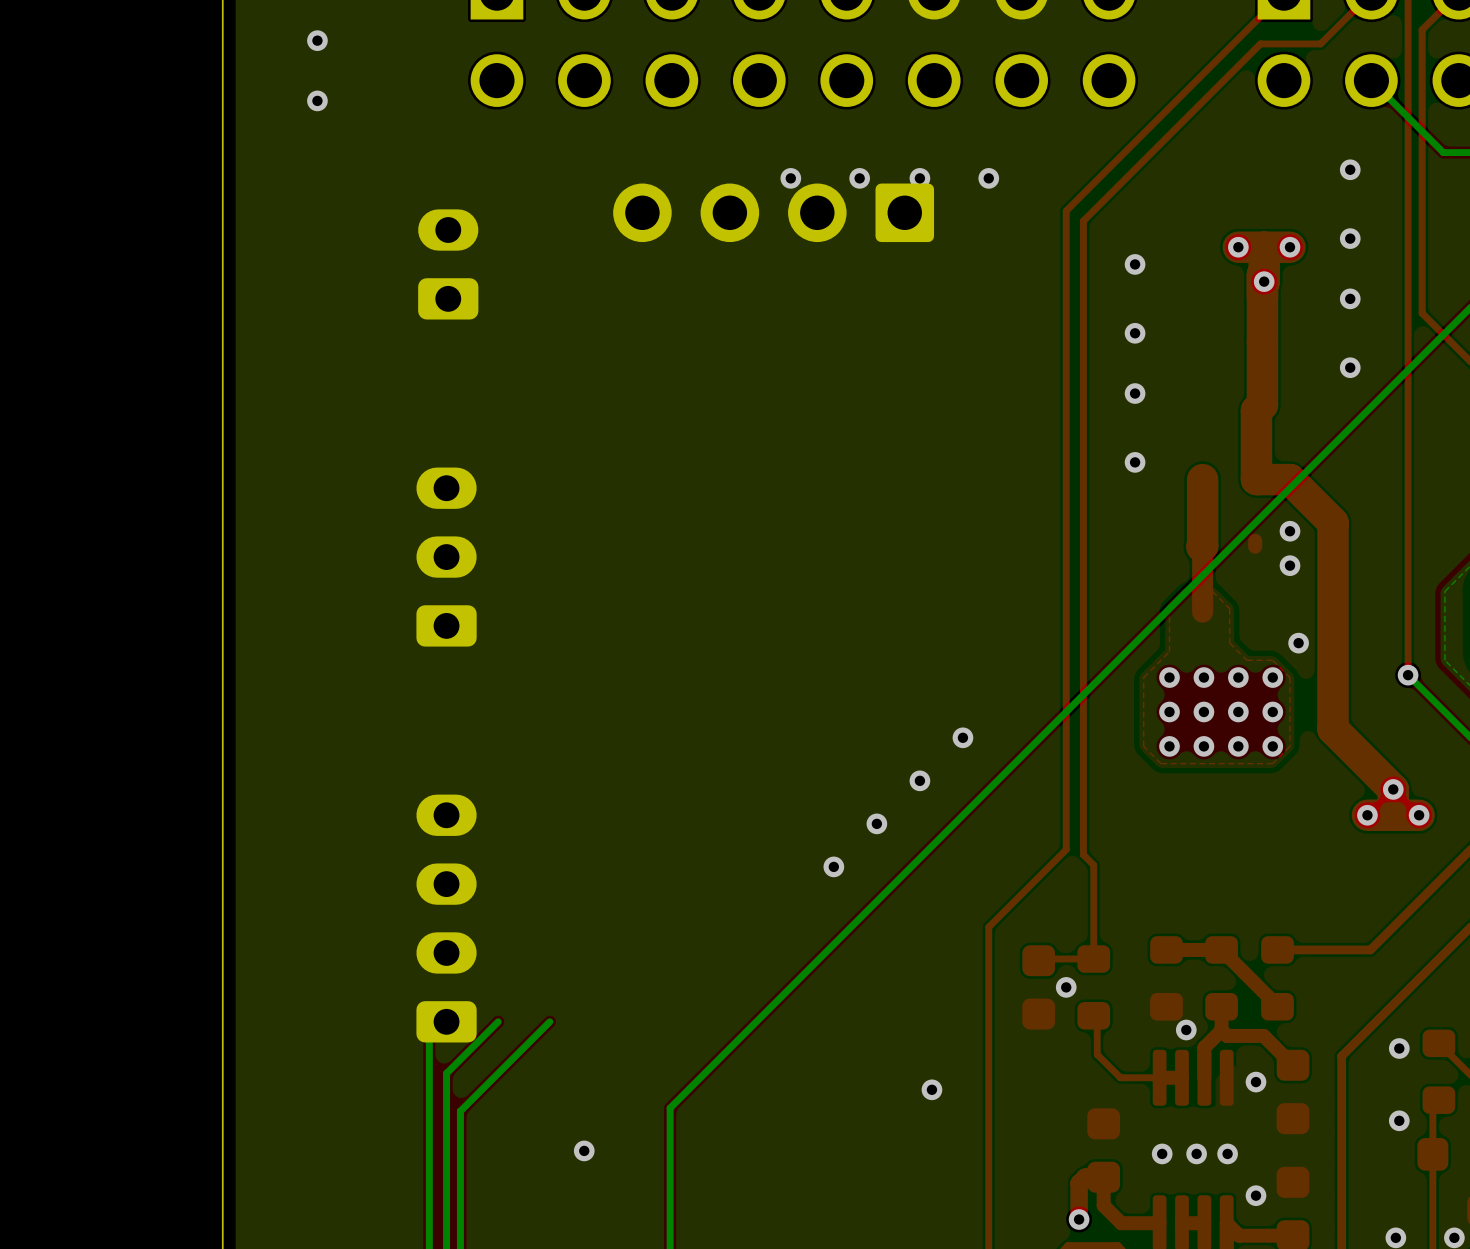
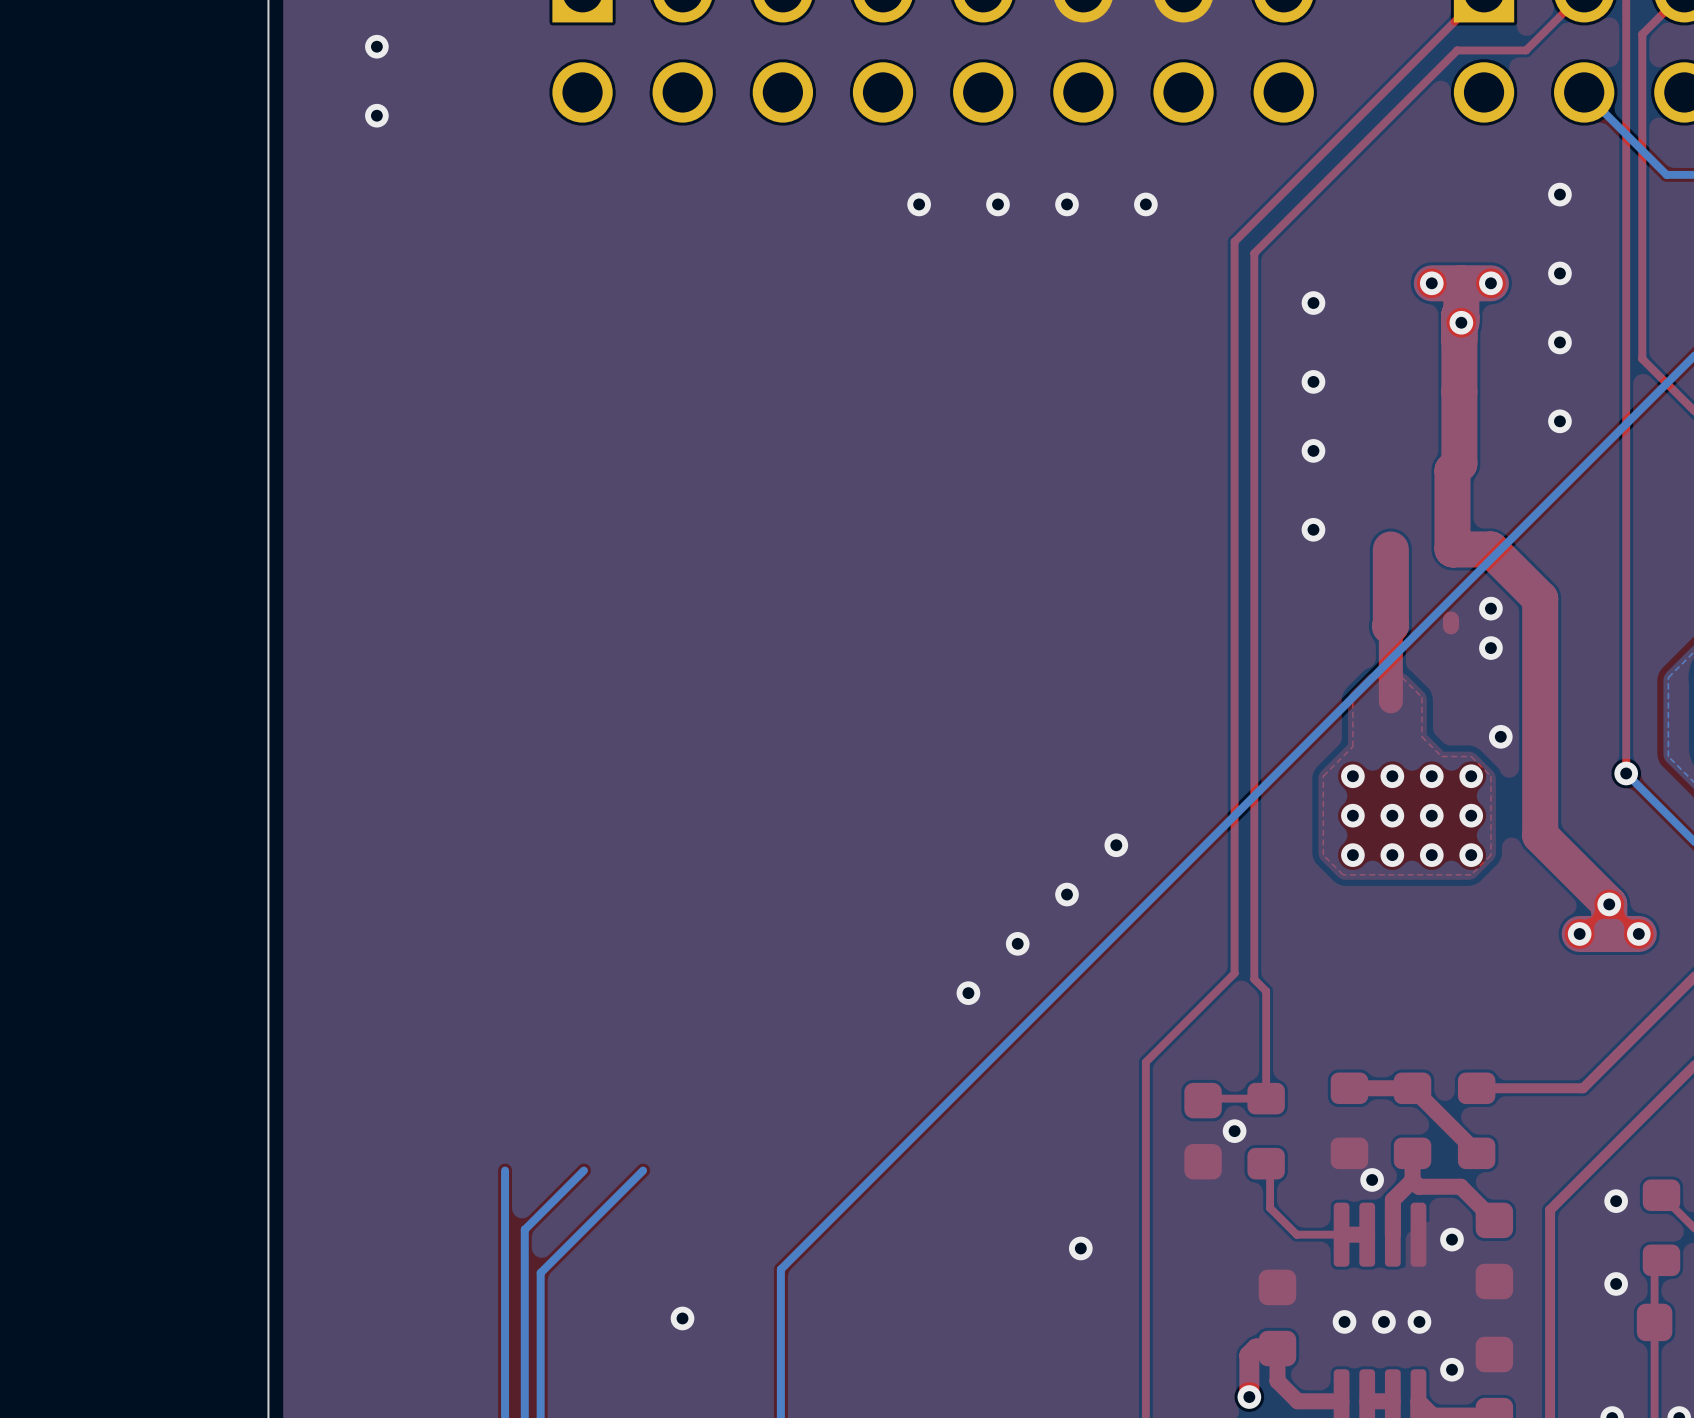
part: (773, 212) -> none
part: (448, 264) -> none
part: (446, 557) -> none
part: (446, 918) -> none

